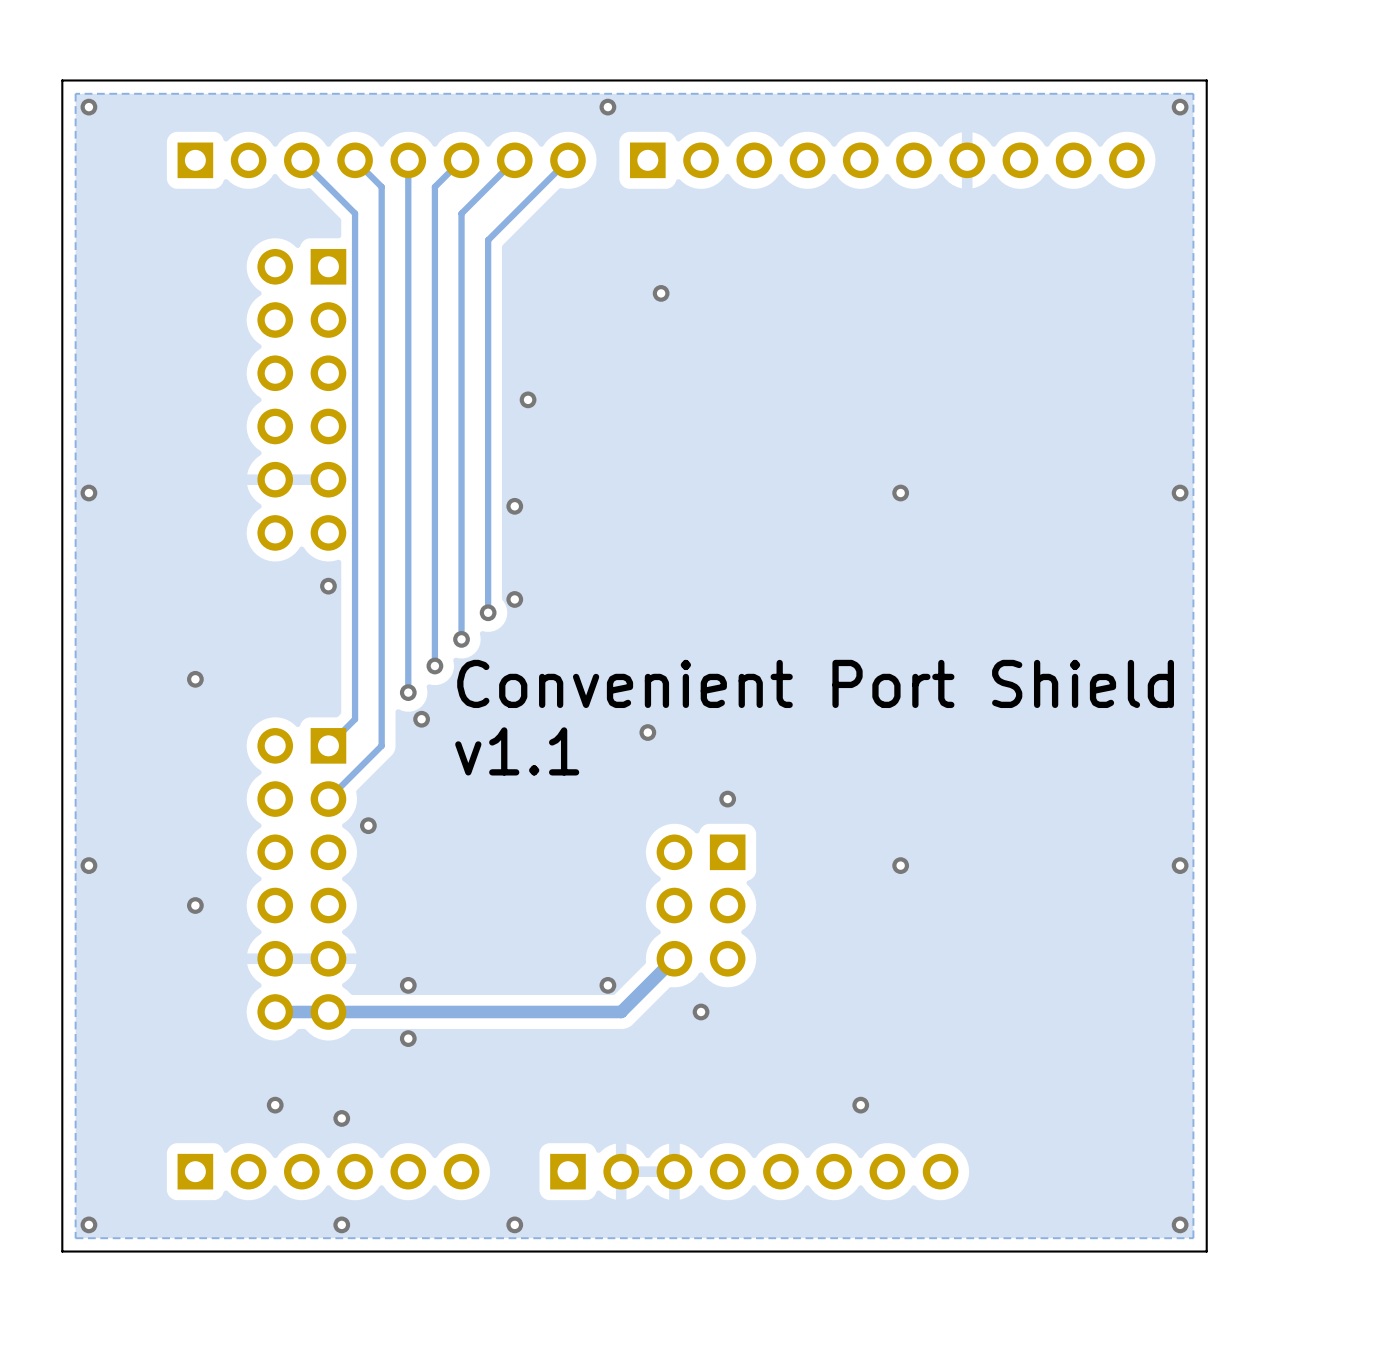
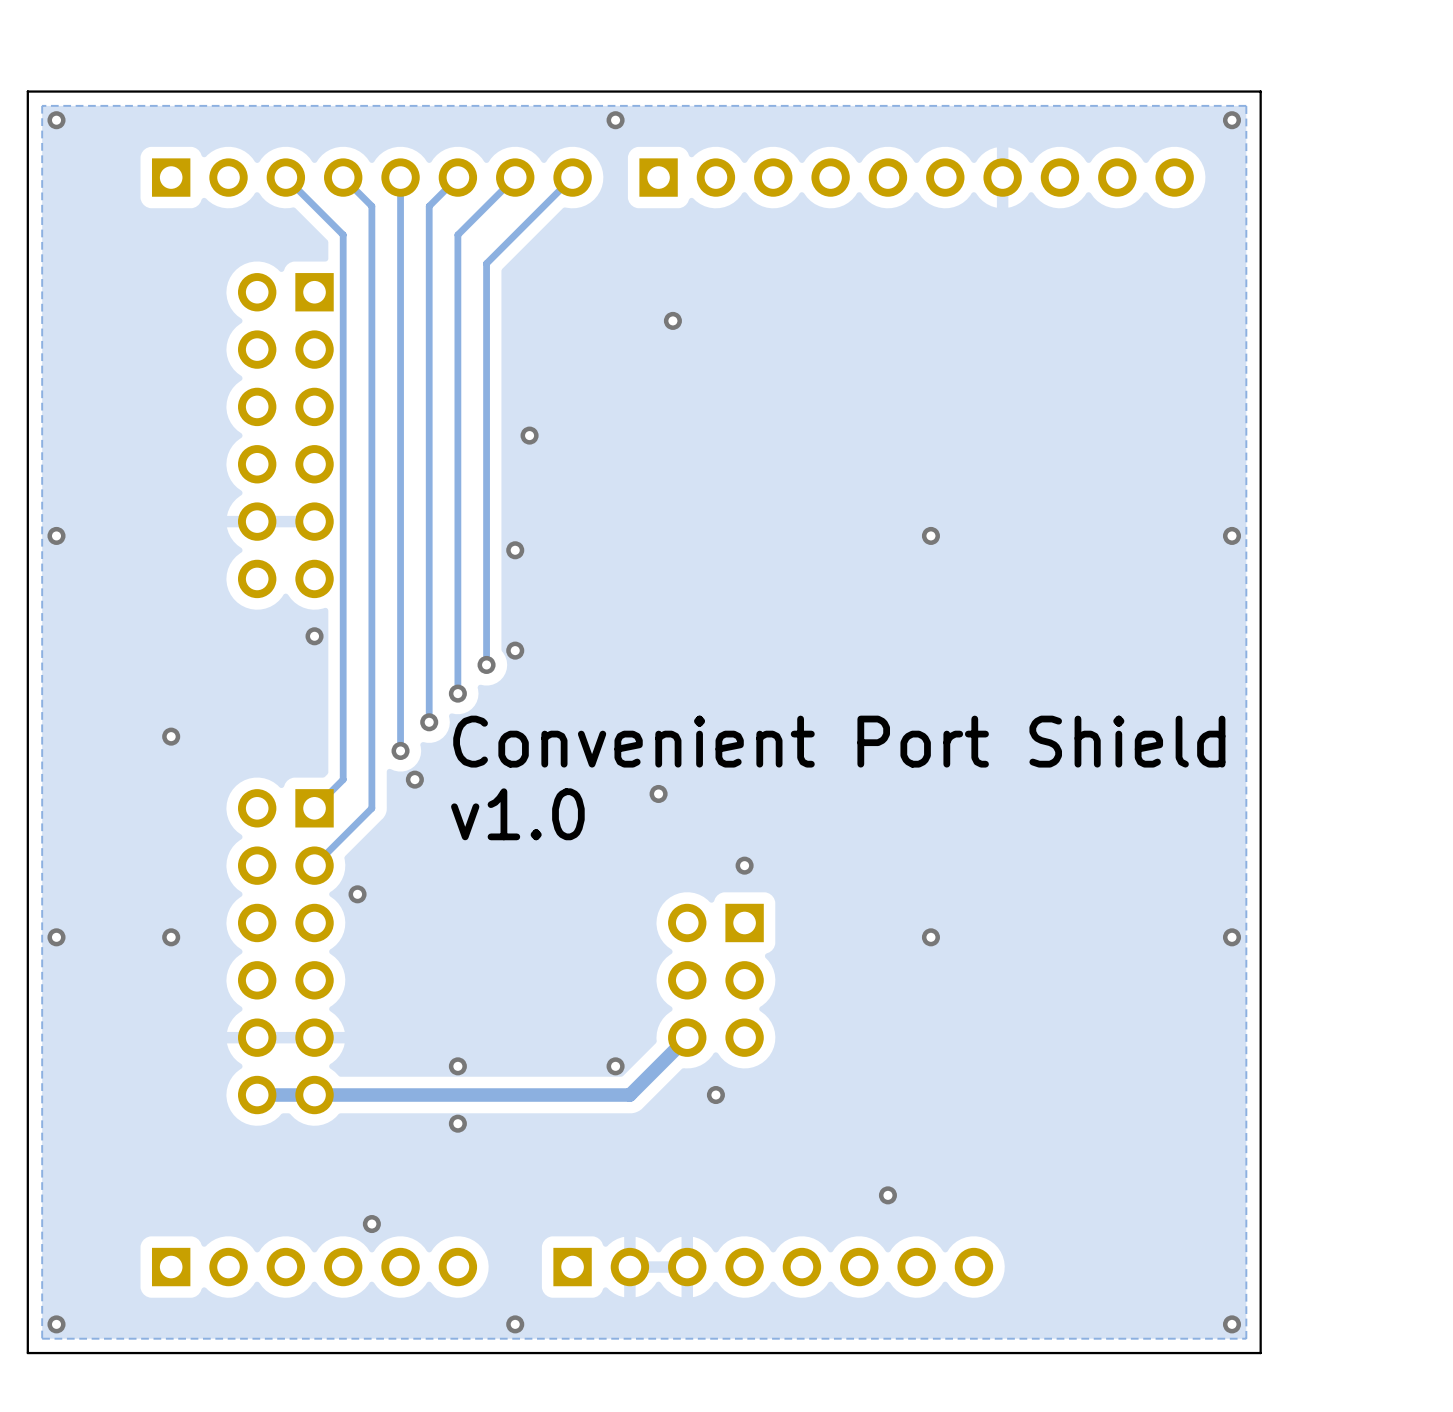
text: v1.1 (517, 751) -> v1.0 (517, 814)
via position: (195, 905) -> (171, 937)
via: (408, 985) -> none
via: none -> (457, 1066)
via: (408, 1038) -> none
via: none -> (457, 1123)
via: (275, 1105) -> none
via position: (341, 1118) -> (371, 1224)
via: (341, 1224) -> none

